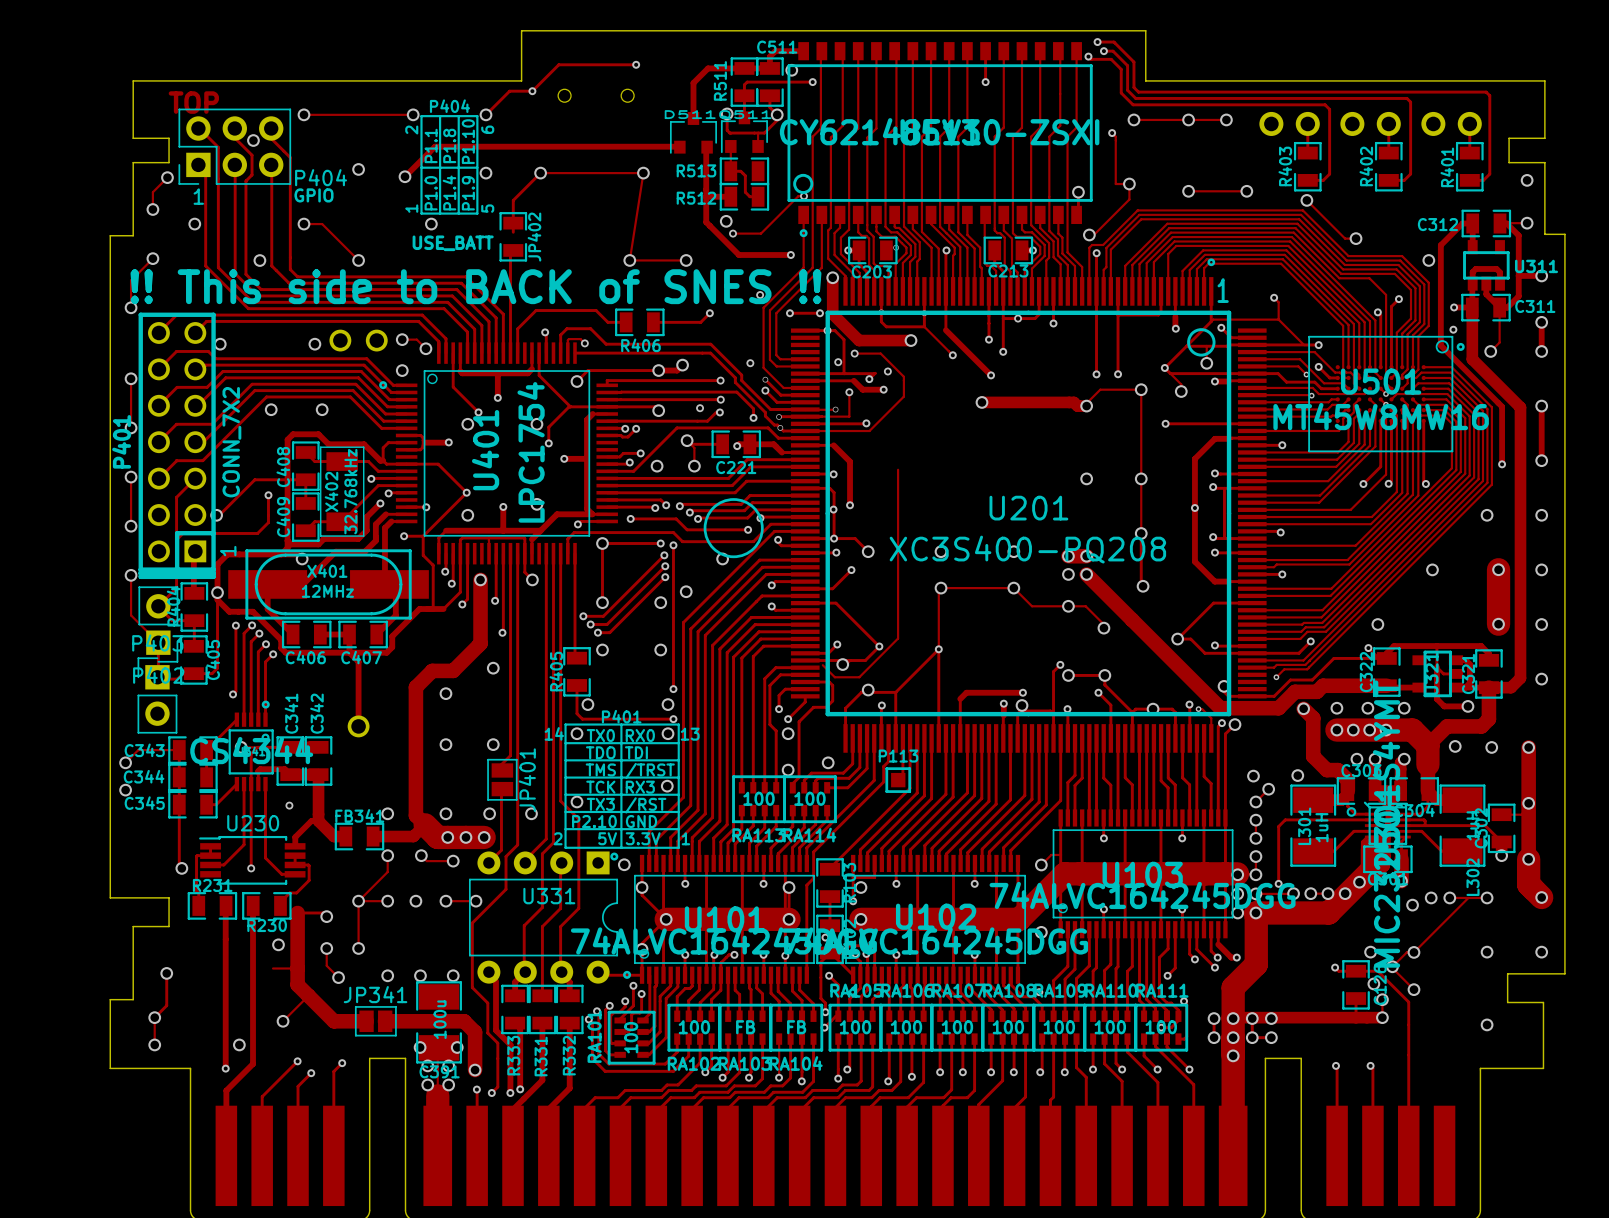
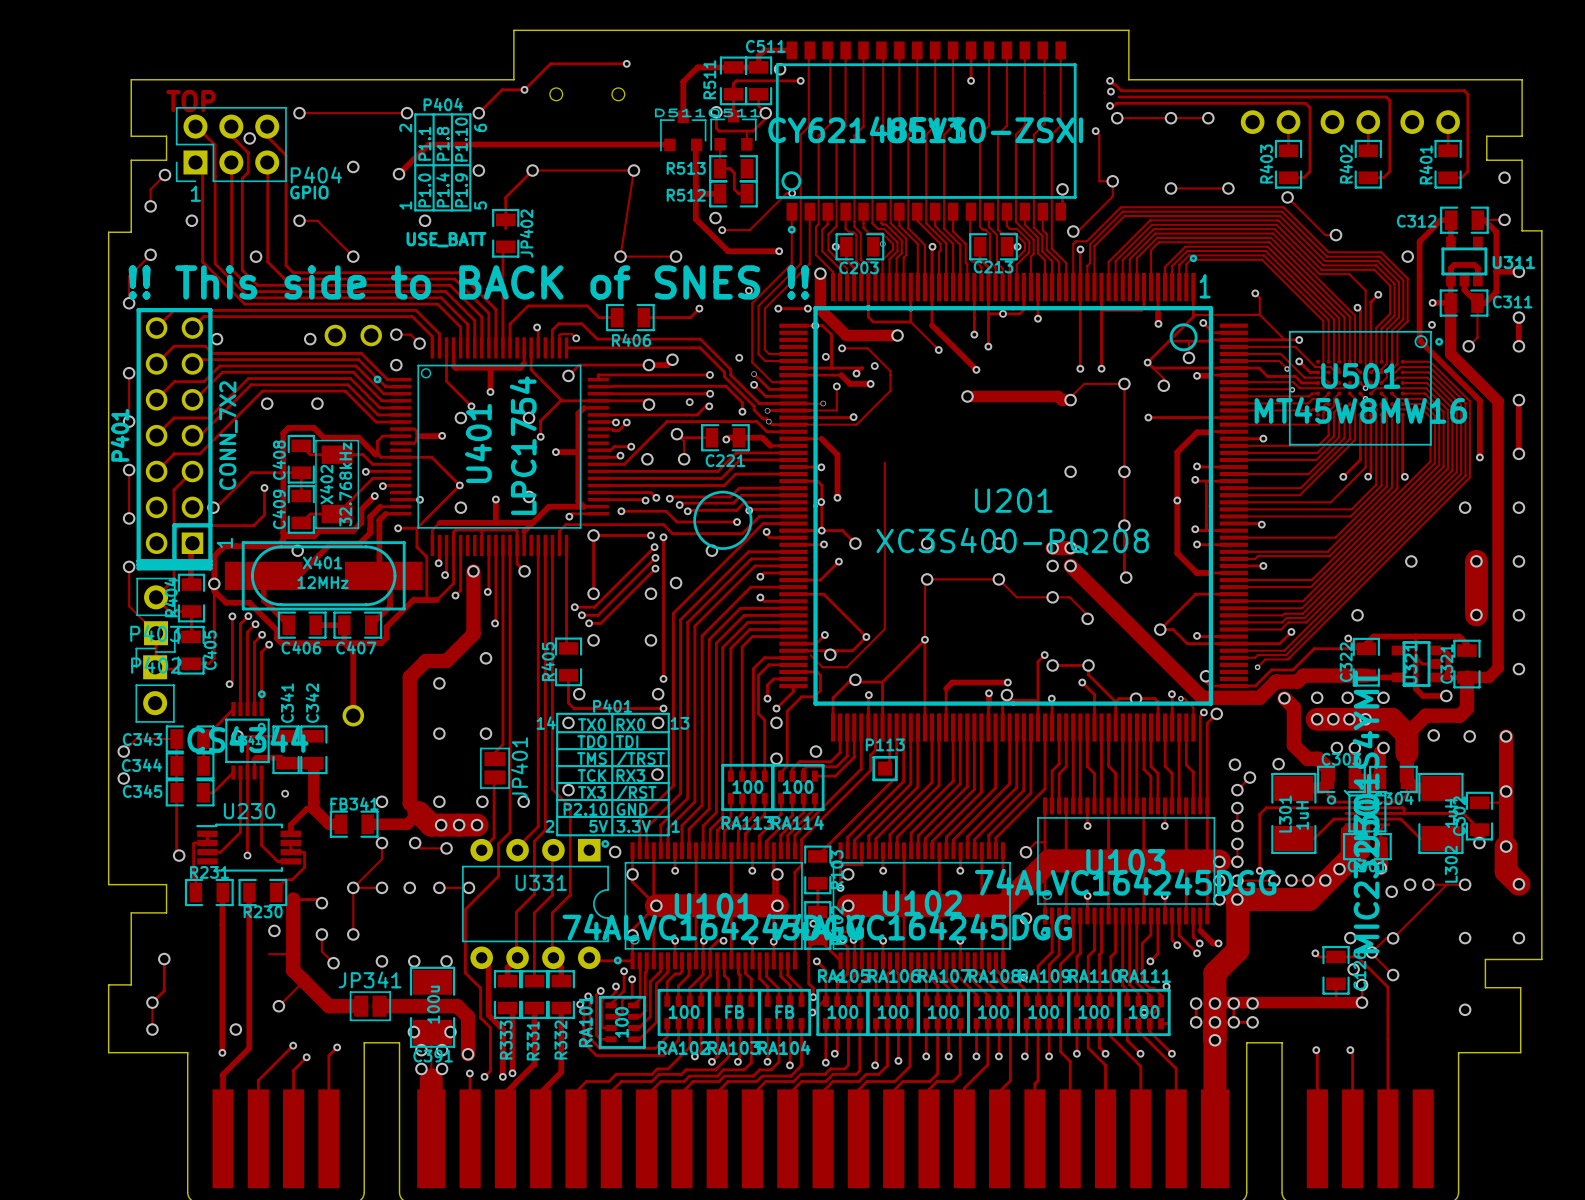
track: (1097, 42) (1113, 42) (1133, 62) (1133, 87) (1138, 92) -> (1110, 80) (1121, 90)
via: (1097, 42) -> none
track: (1103, 51) (1113, 51) (1127, 65) (1127, 90) (1135, 98) -> none
via: (1103, 51) -> none
track: (1088, 56) (1091, 59) (1111, 59) (1121, 69) (1121, 93) (1133, 104) -> (1110, 105) (1116, 103)
via: (1088, 56) -> none
via: none -> (1110, 80)
via: none -> (1110, 91)
via: none -> (1110, 105)

